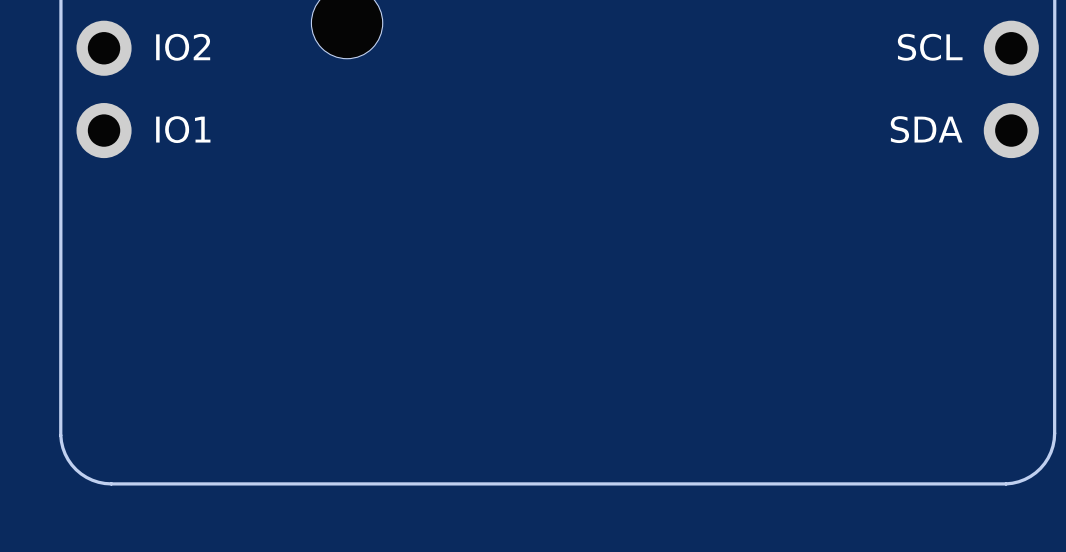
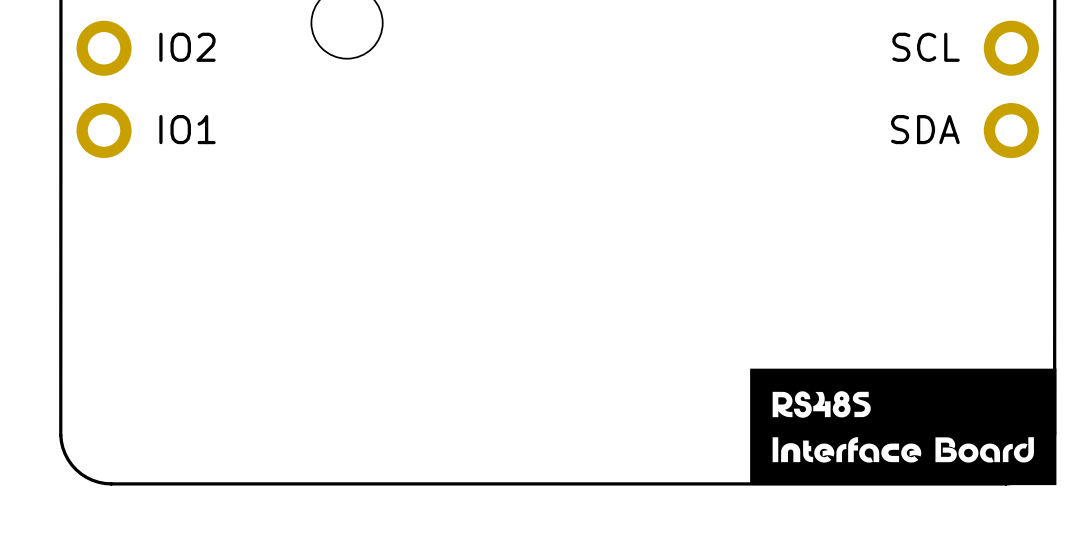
drawing: none -> [750, 368, 1057, 486]

